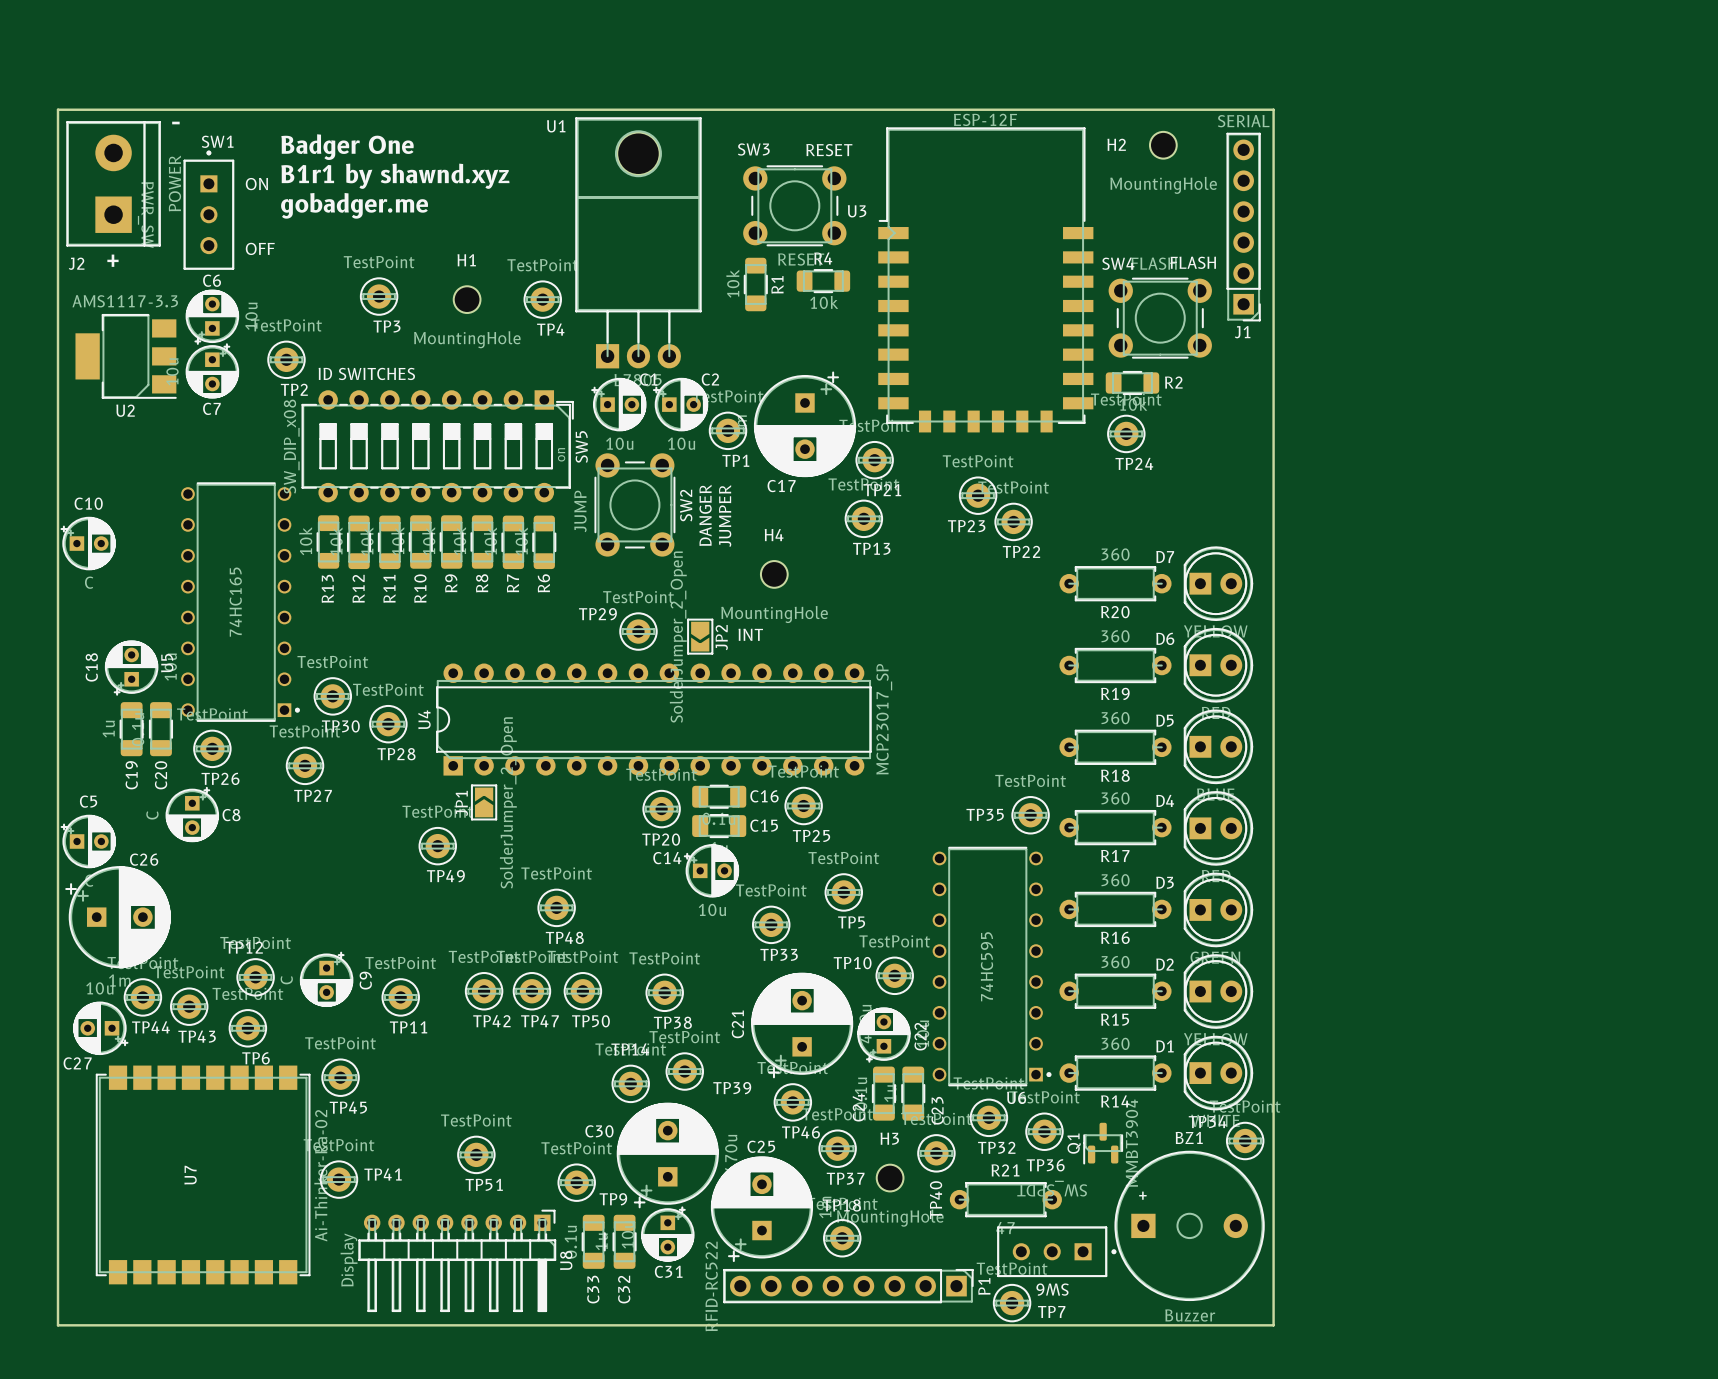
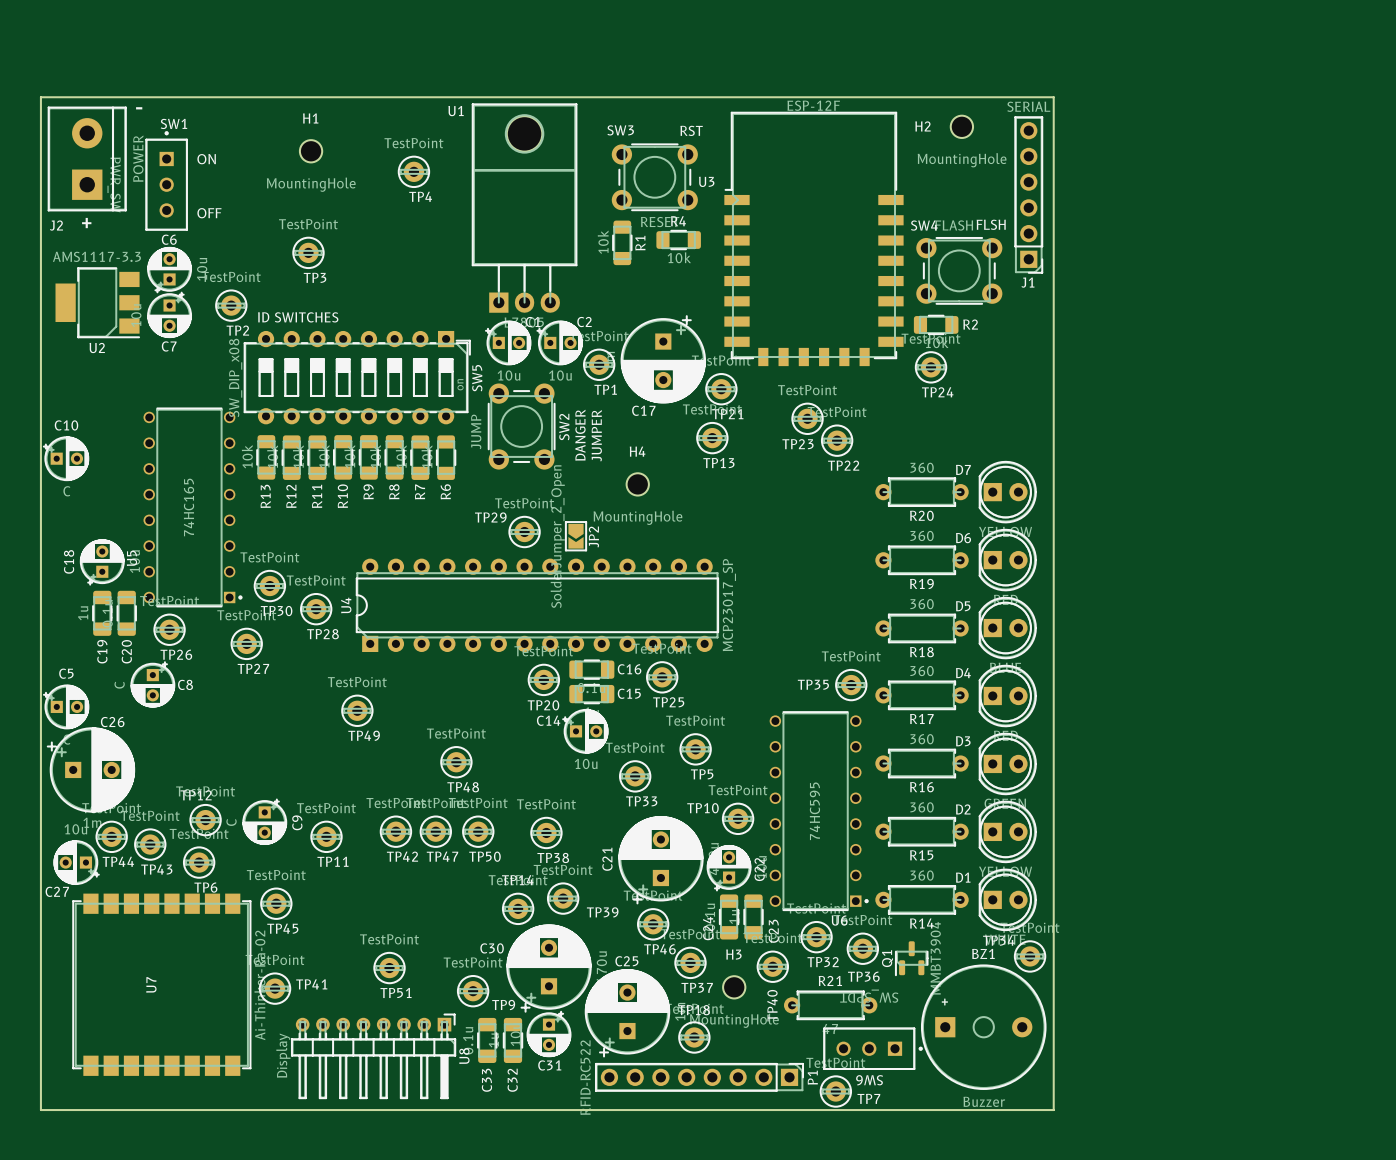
text: Badger One (347, 147) -> none
text: RESET (829, 150) -> RST (691, 130)
text: B1r1 by shawnd.xyz (395, 176) -> none
text: gobadger.me (354, 205) -> none
text: FLASH (1193, 262) -> FLSH (991, 224)
H1 position: (467, 299) -> (311, 151)
TP4 position: (542, 299) -> (413, 171)
text: INT (750, 634) -> none
JP1: SolderJumper_2_Open (484, 802) -> none

